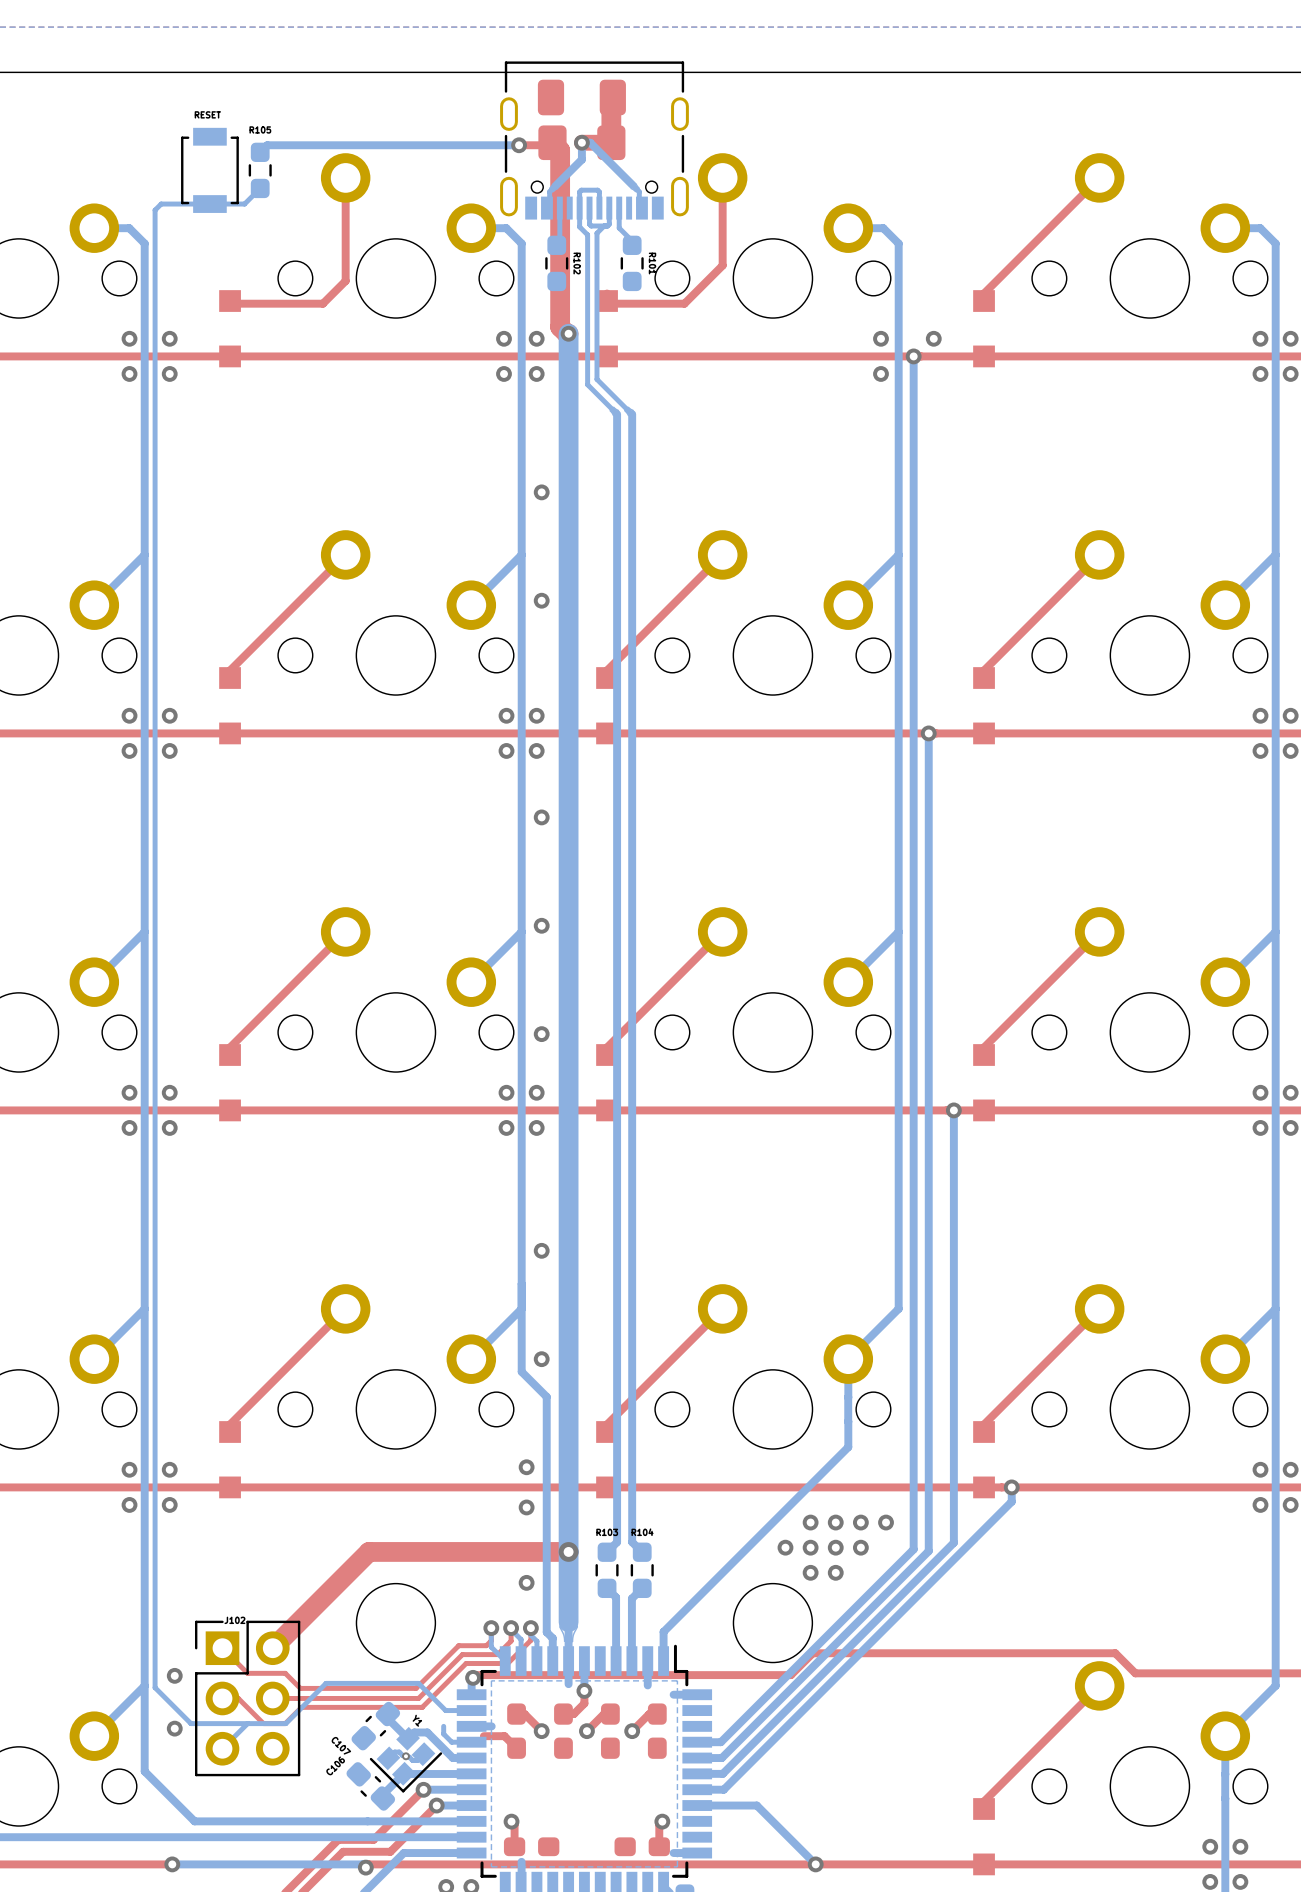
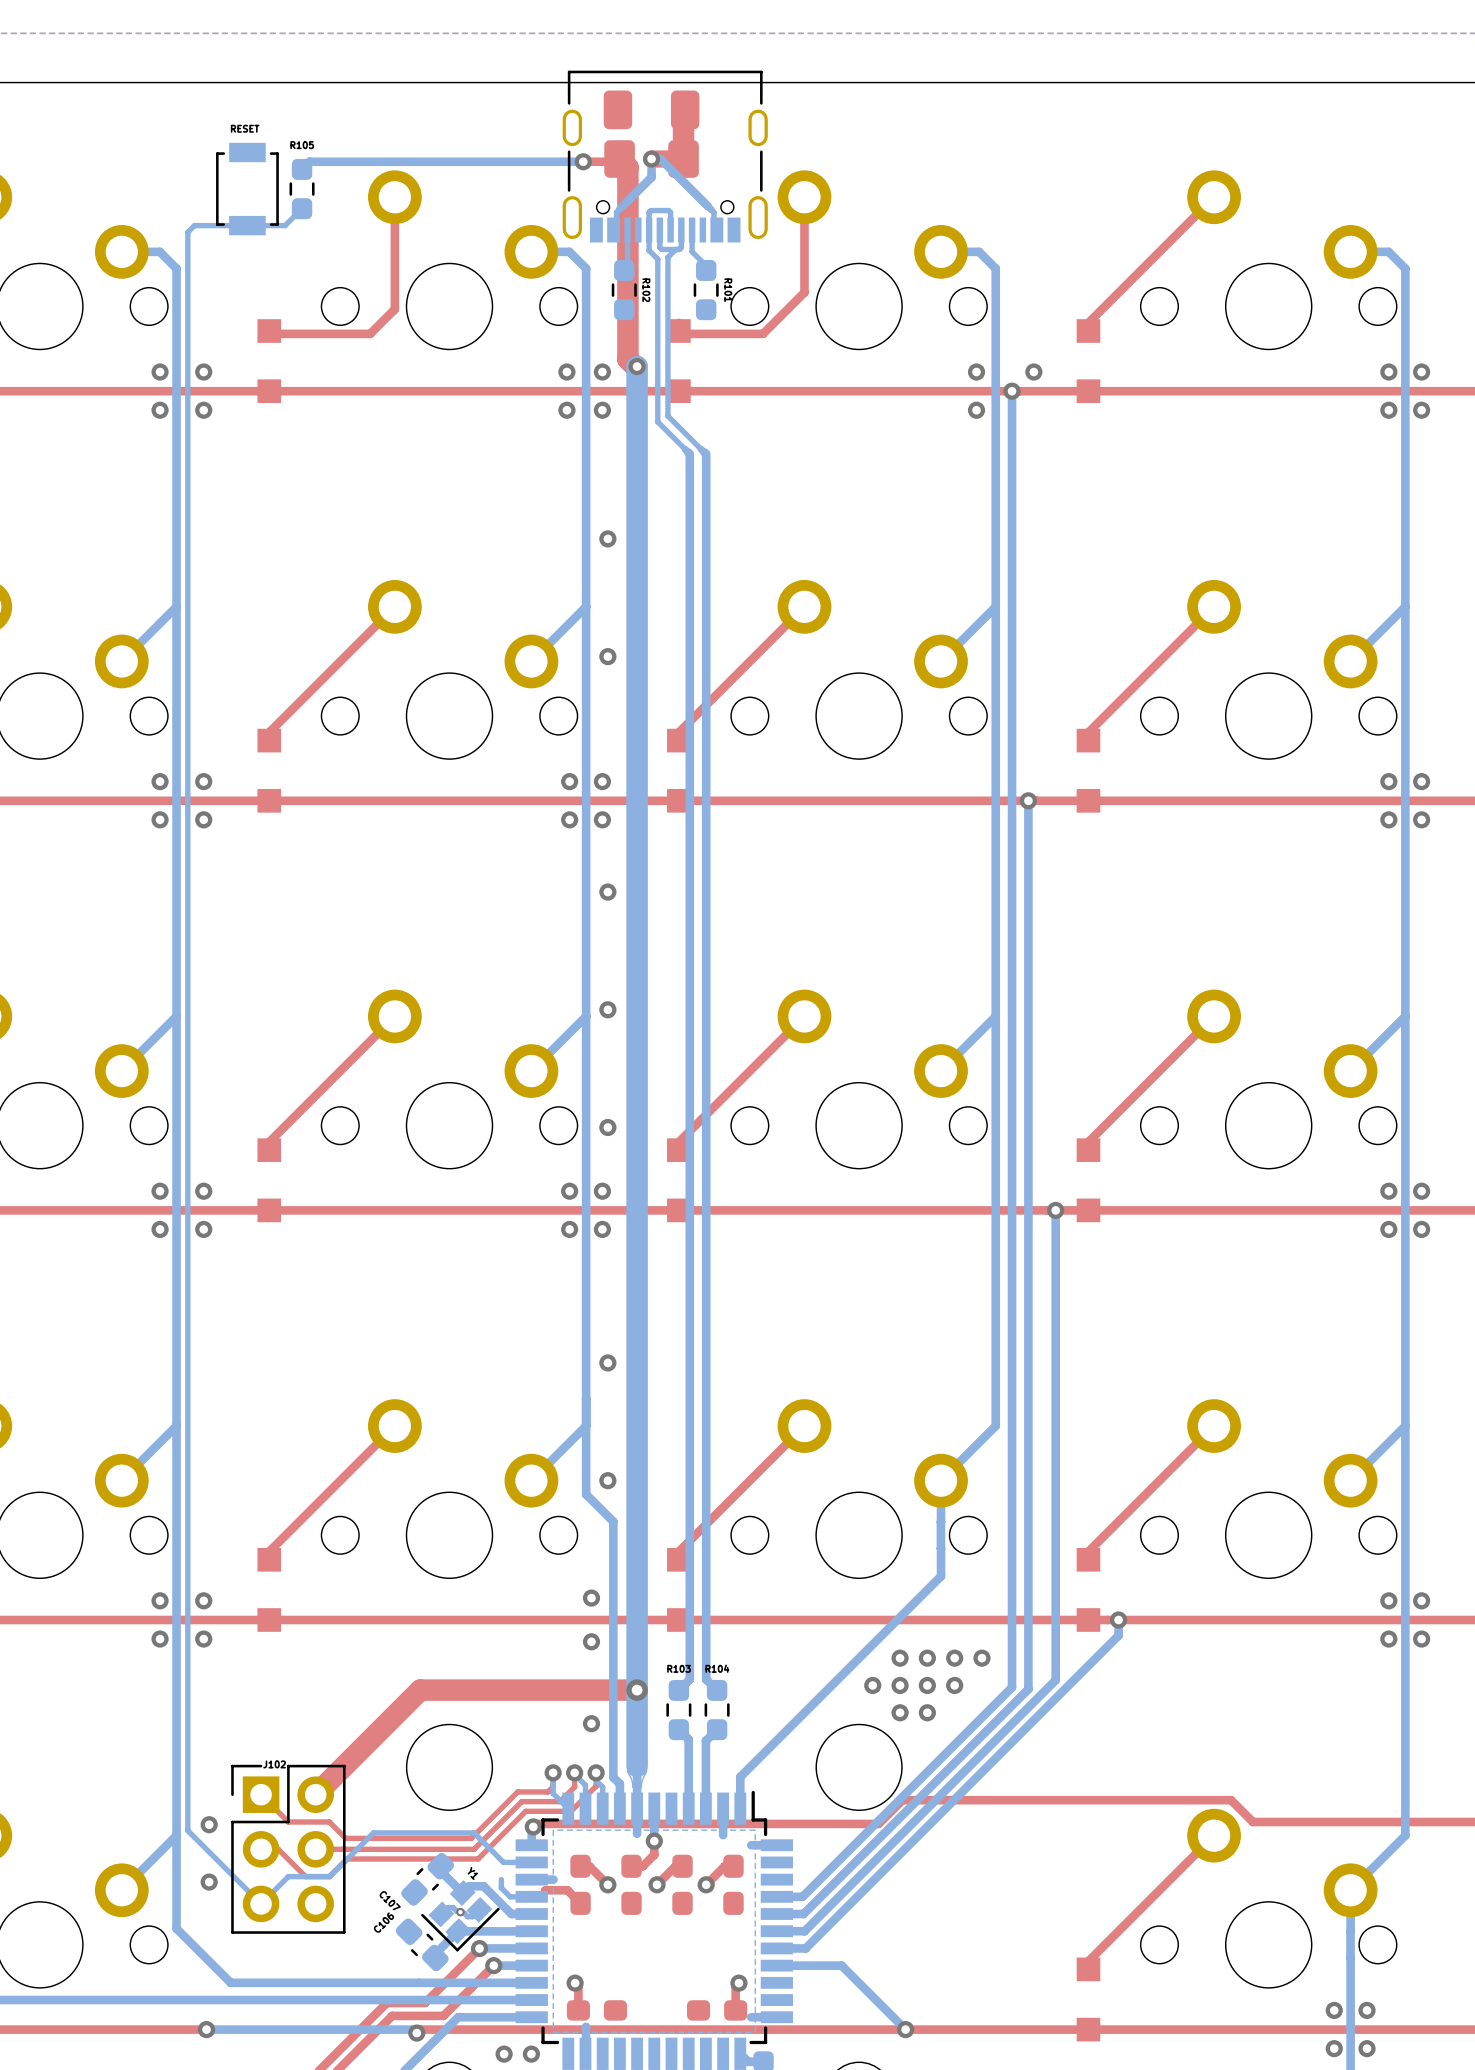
bottom track: (155, 1681) (155, 1687) (190, 1723) (247, 1723) -> (187, 1830) (261, 1903)

